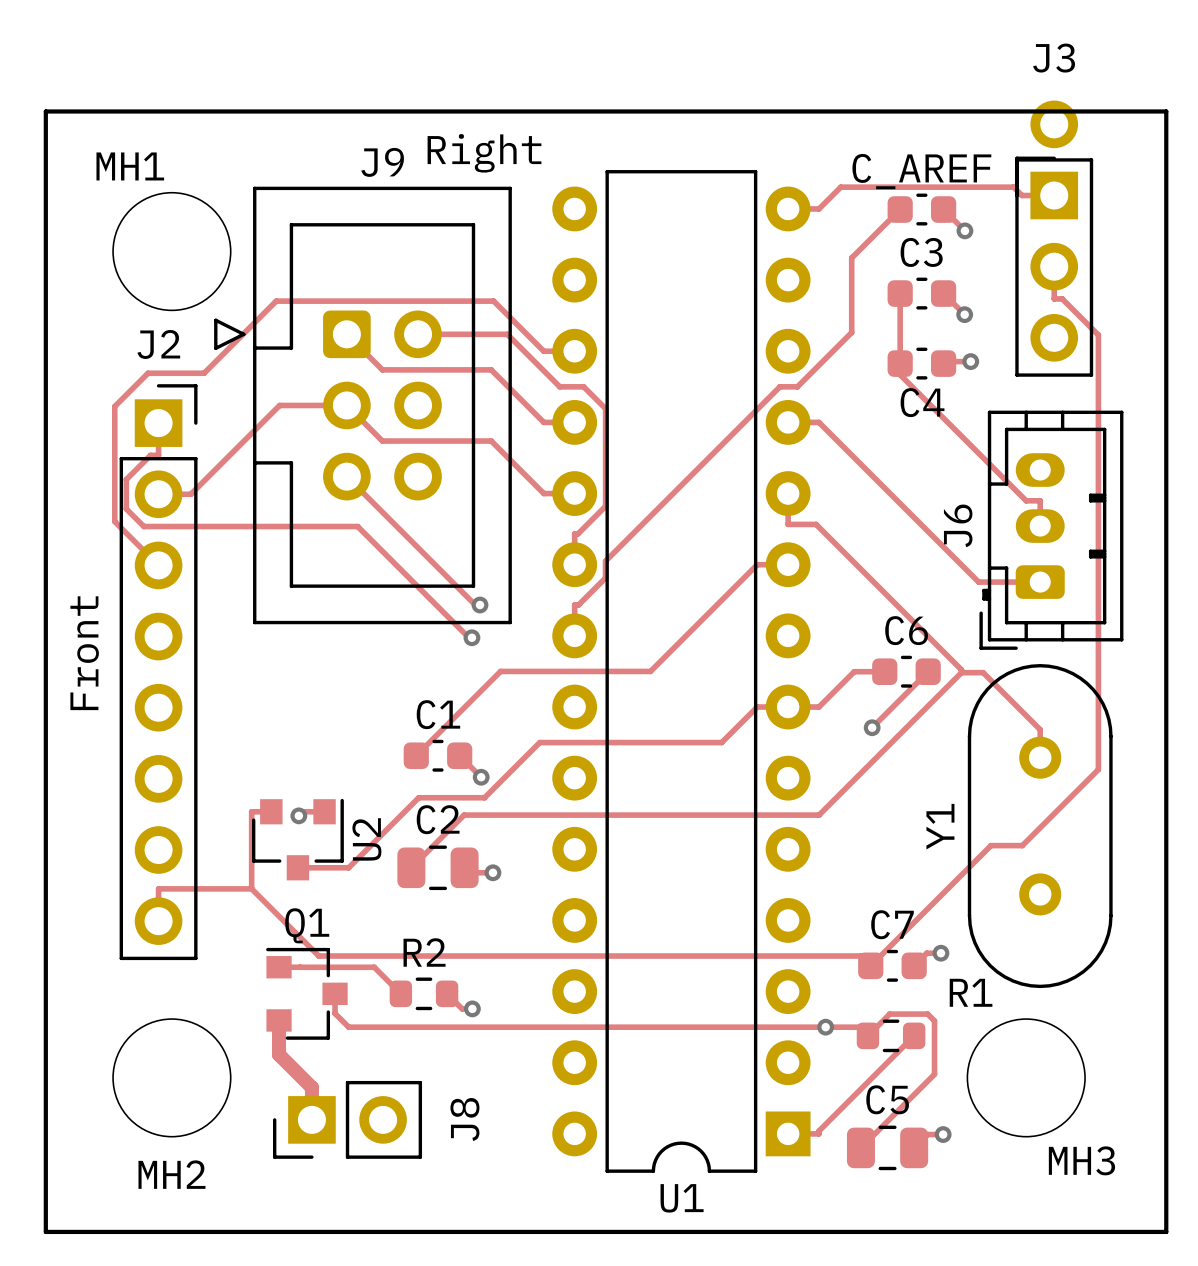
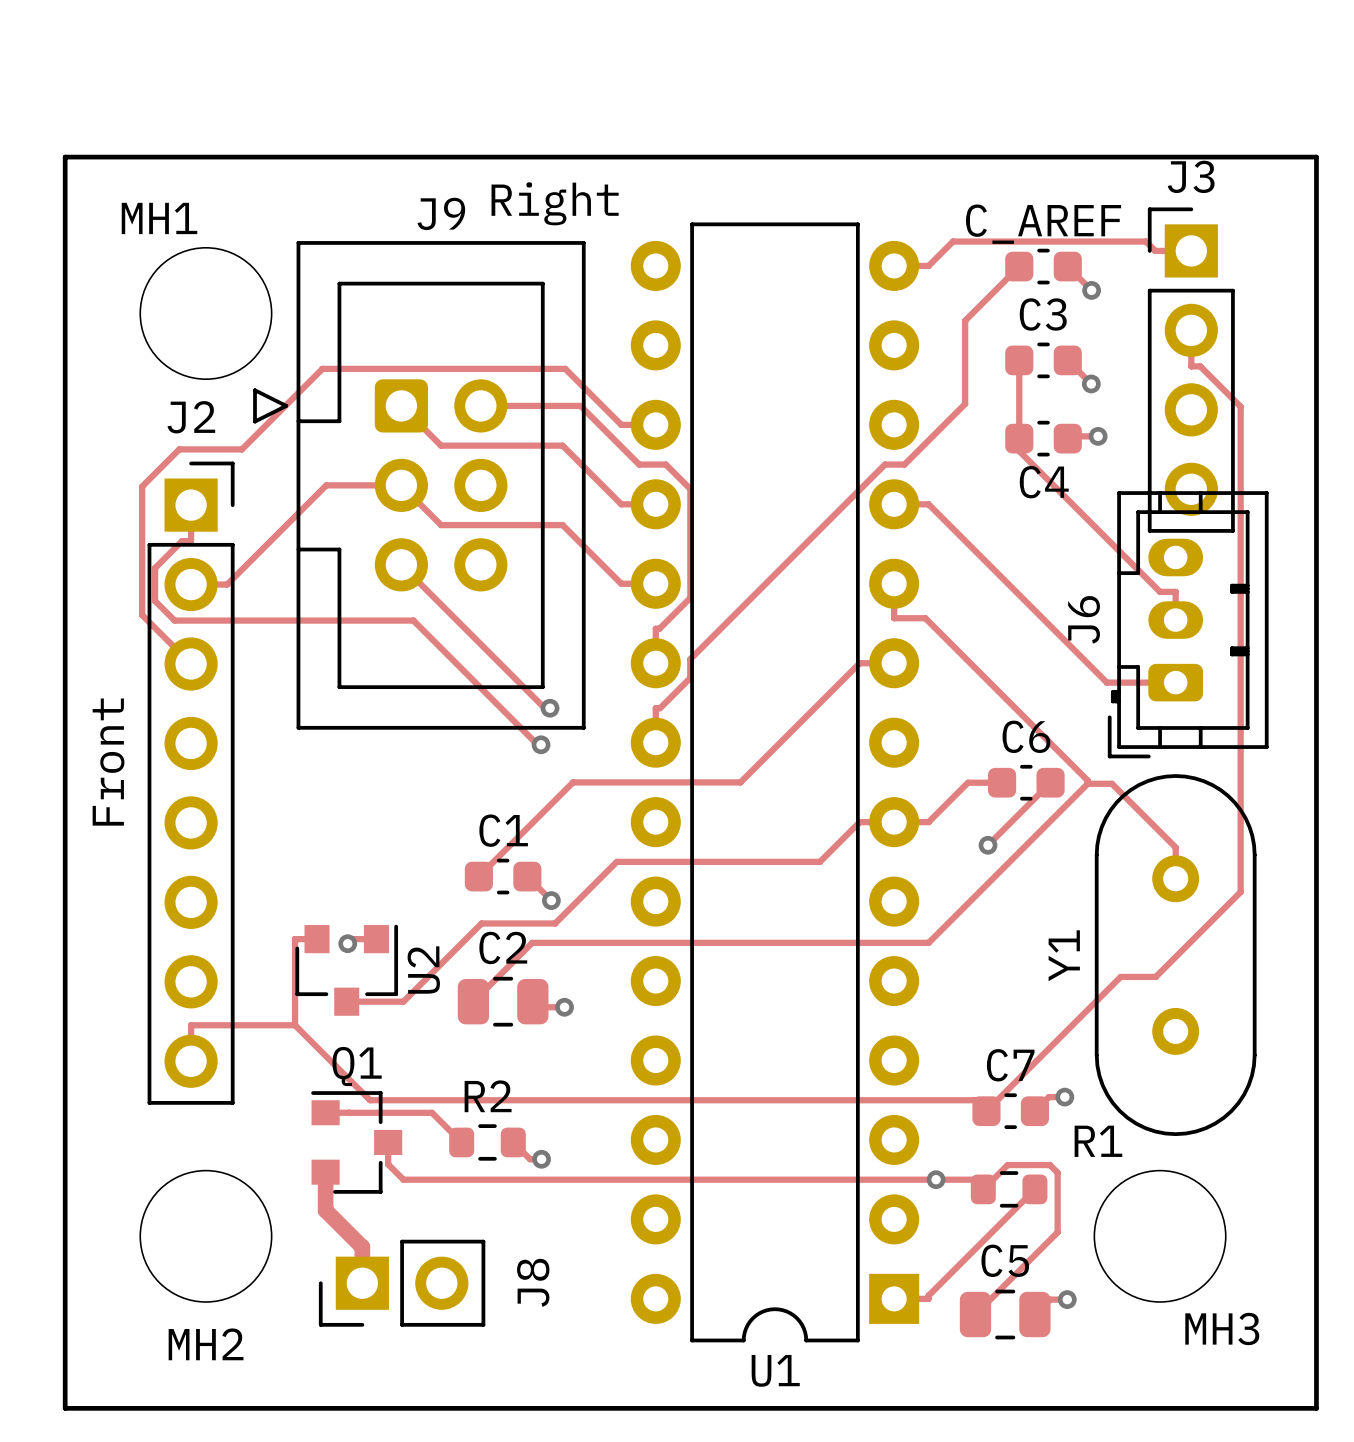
J3 footprint: [1015, 100, 1094, 377] -> [1147, 207, 1235, 533]

